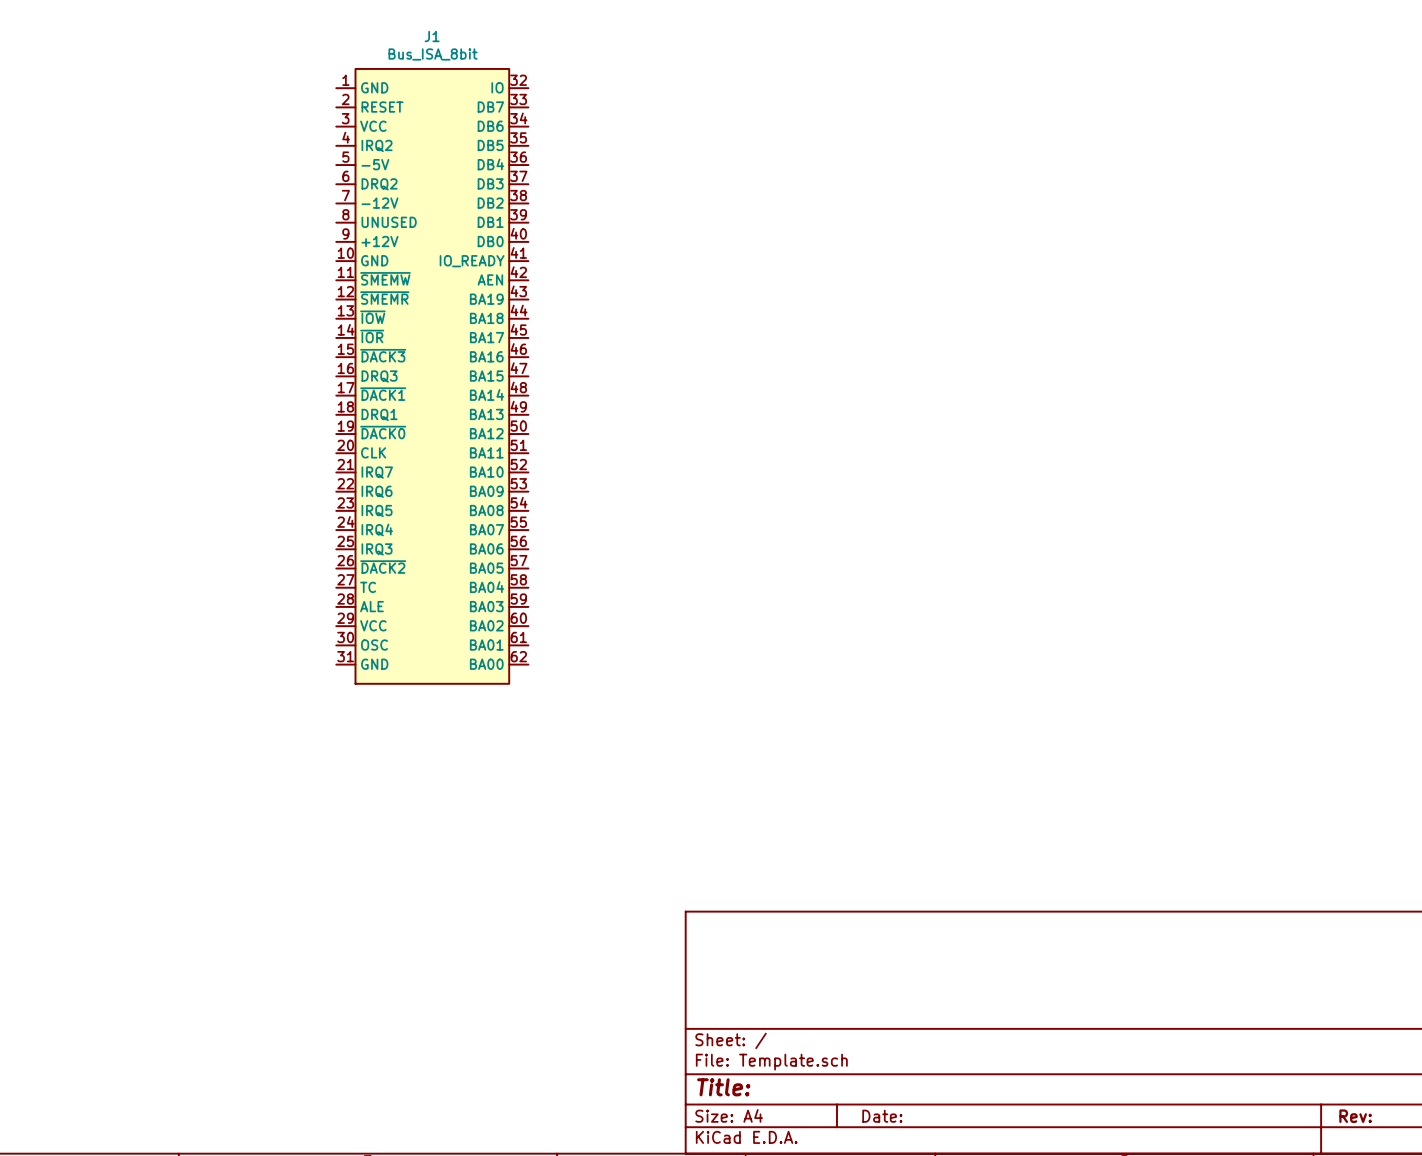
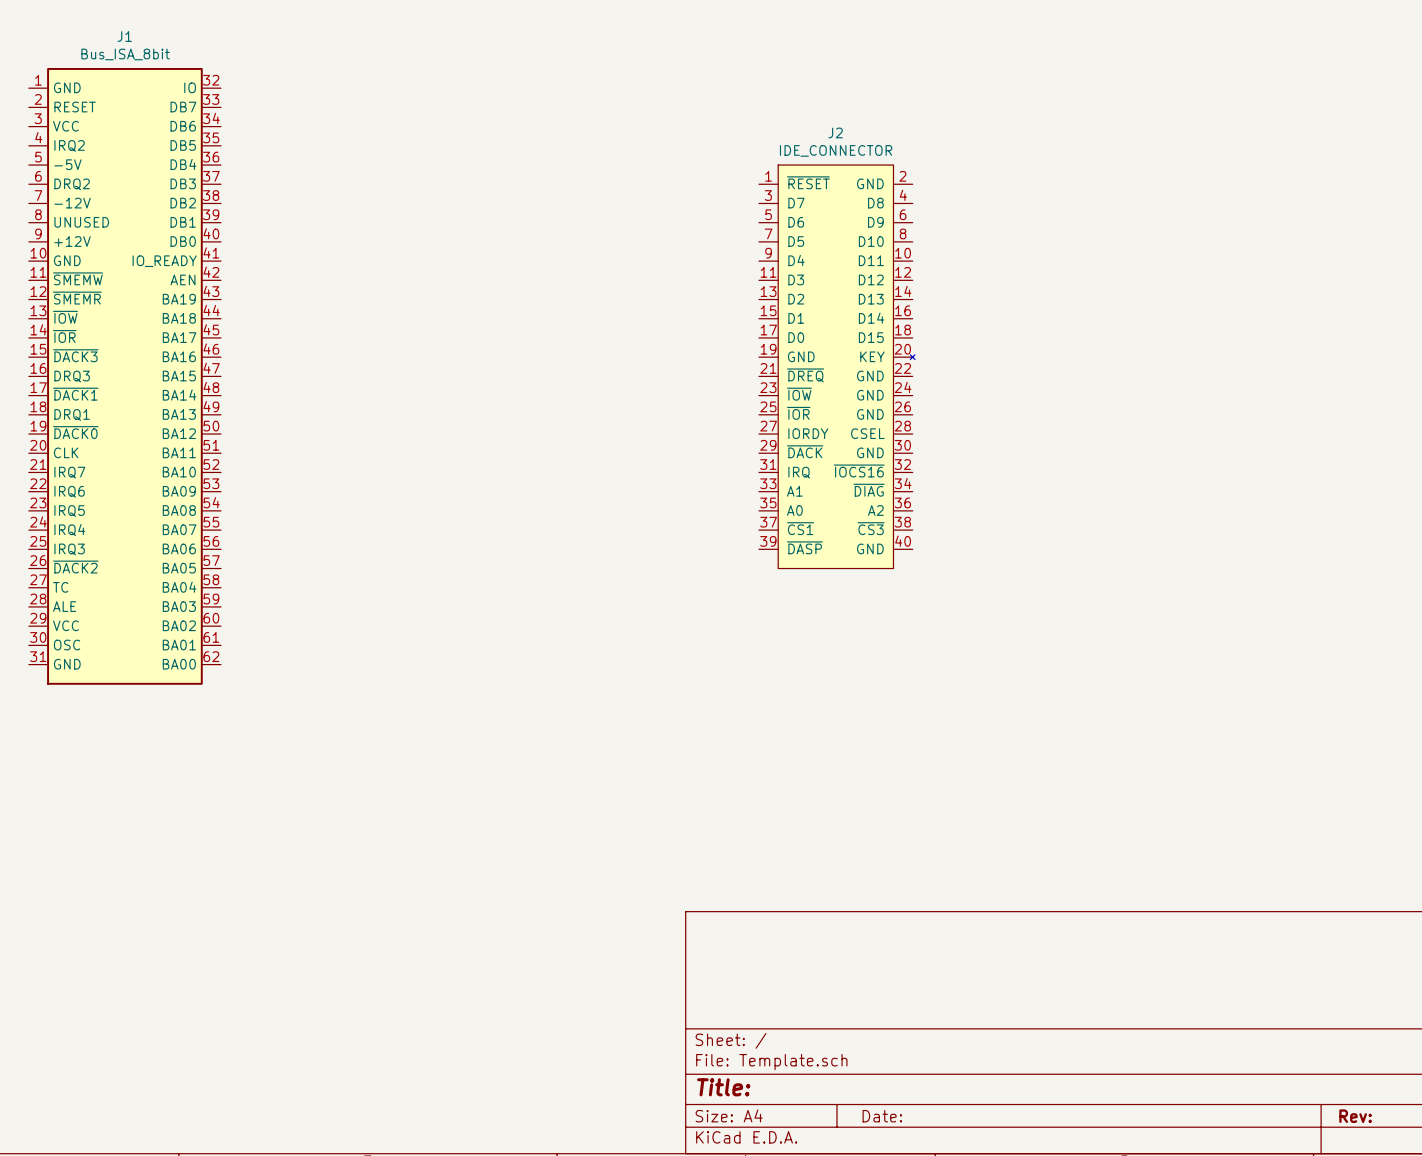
J2: none -> IDE_CONNECTOR (836, 366)
J1 position: (432, 376) -> (124, 376)

